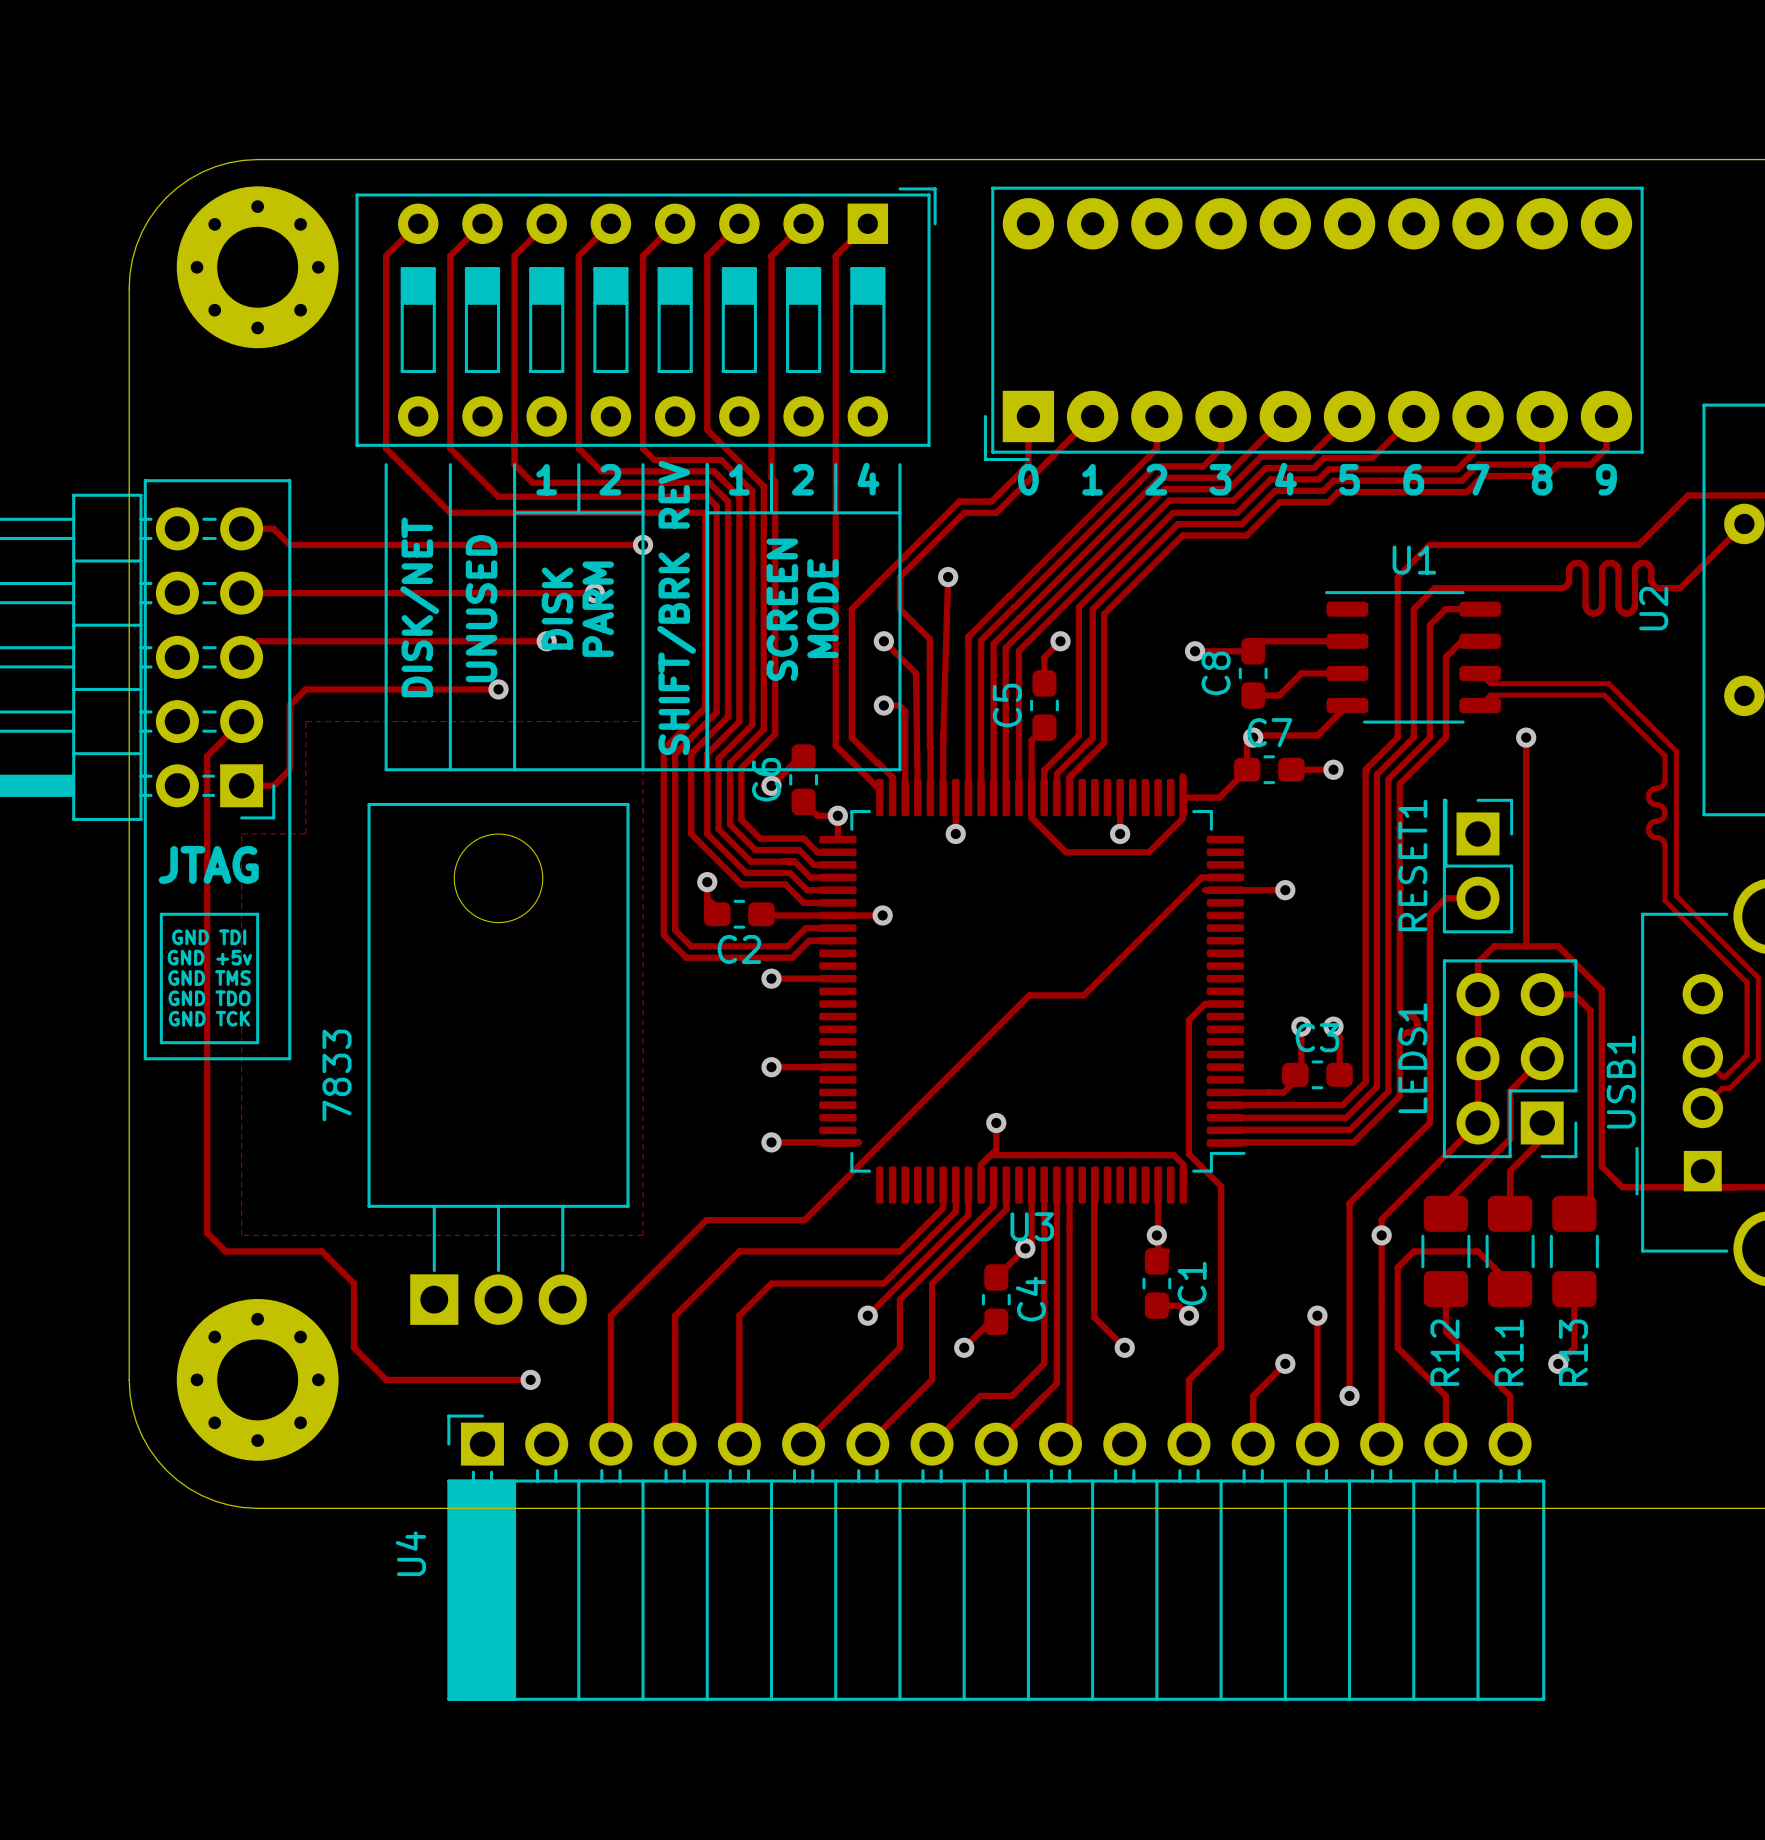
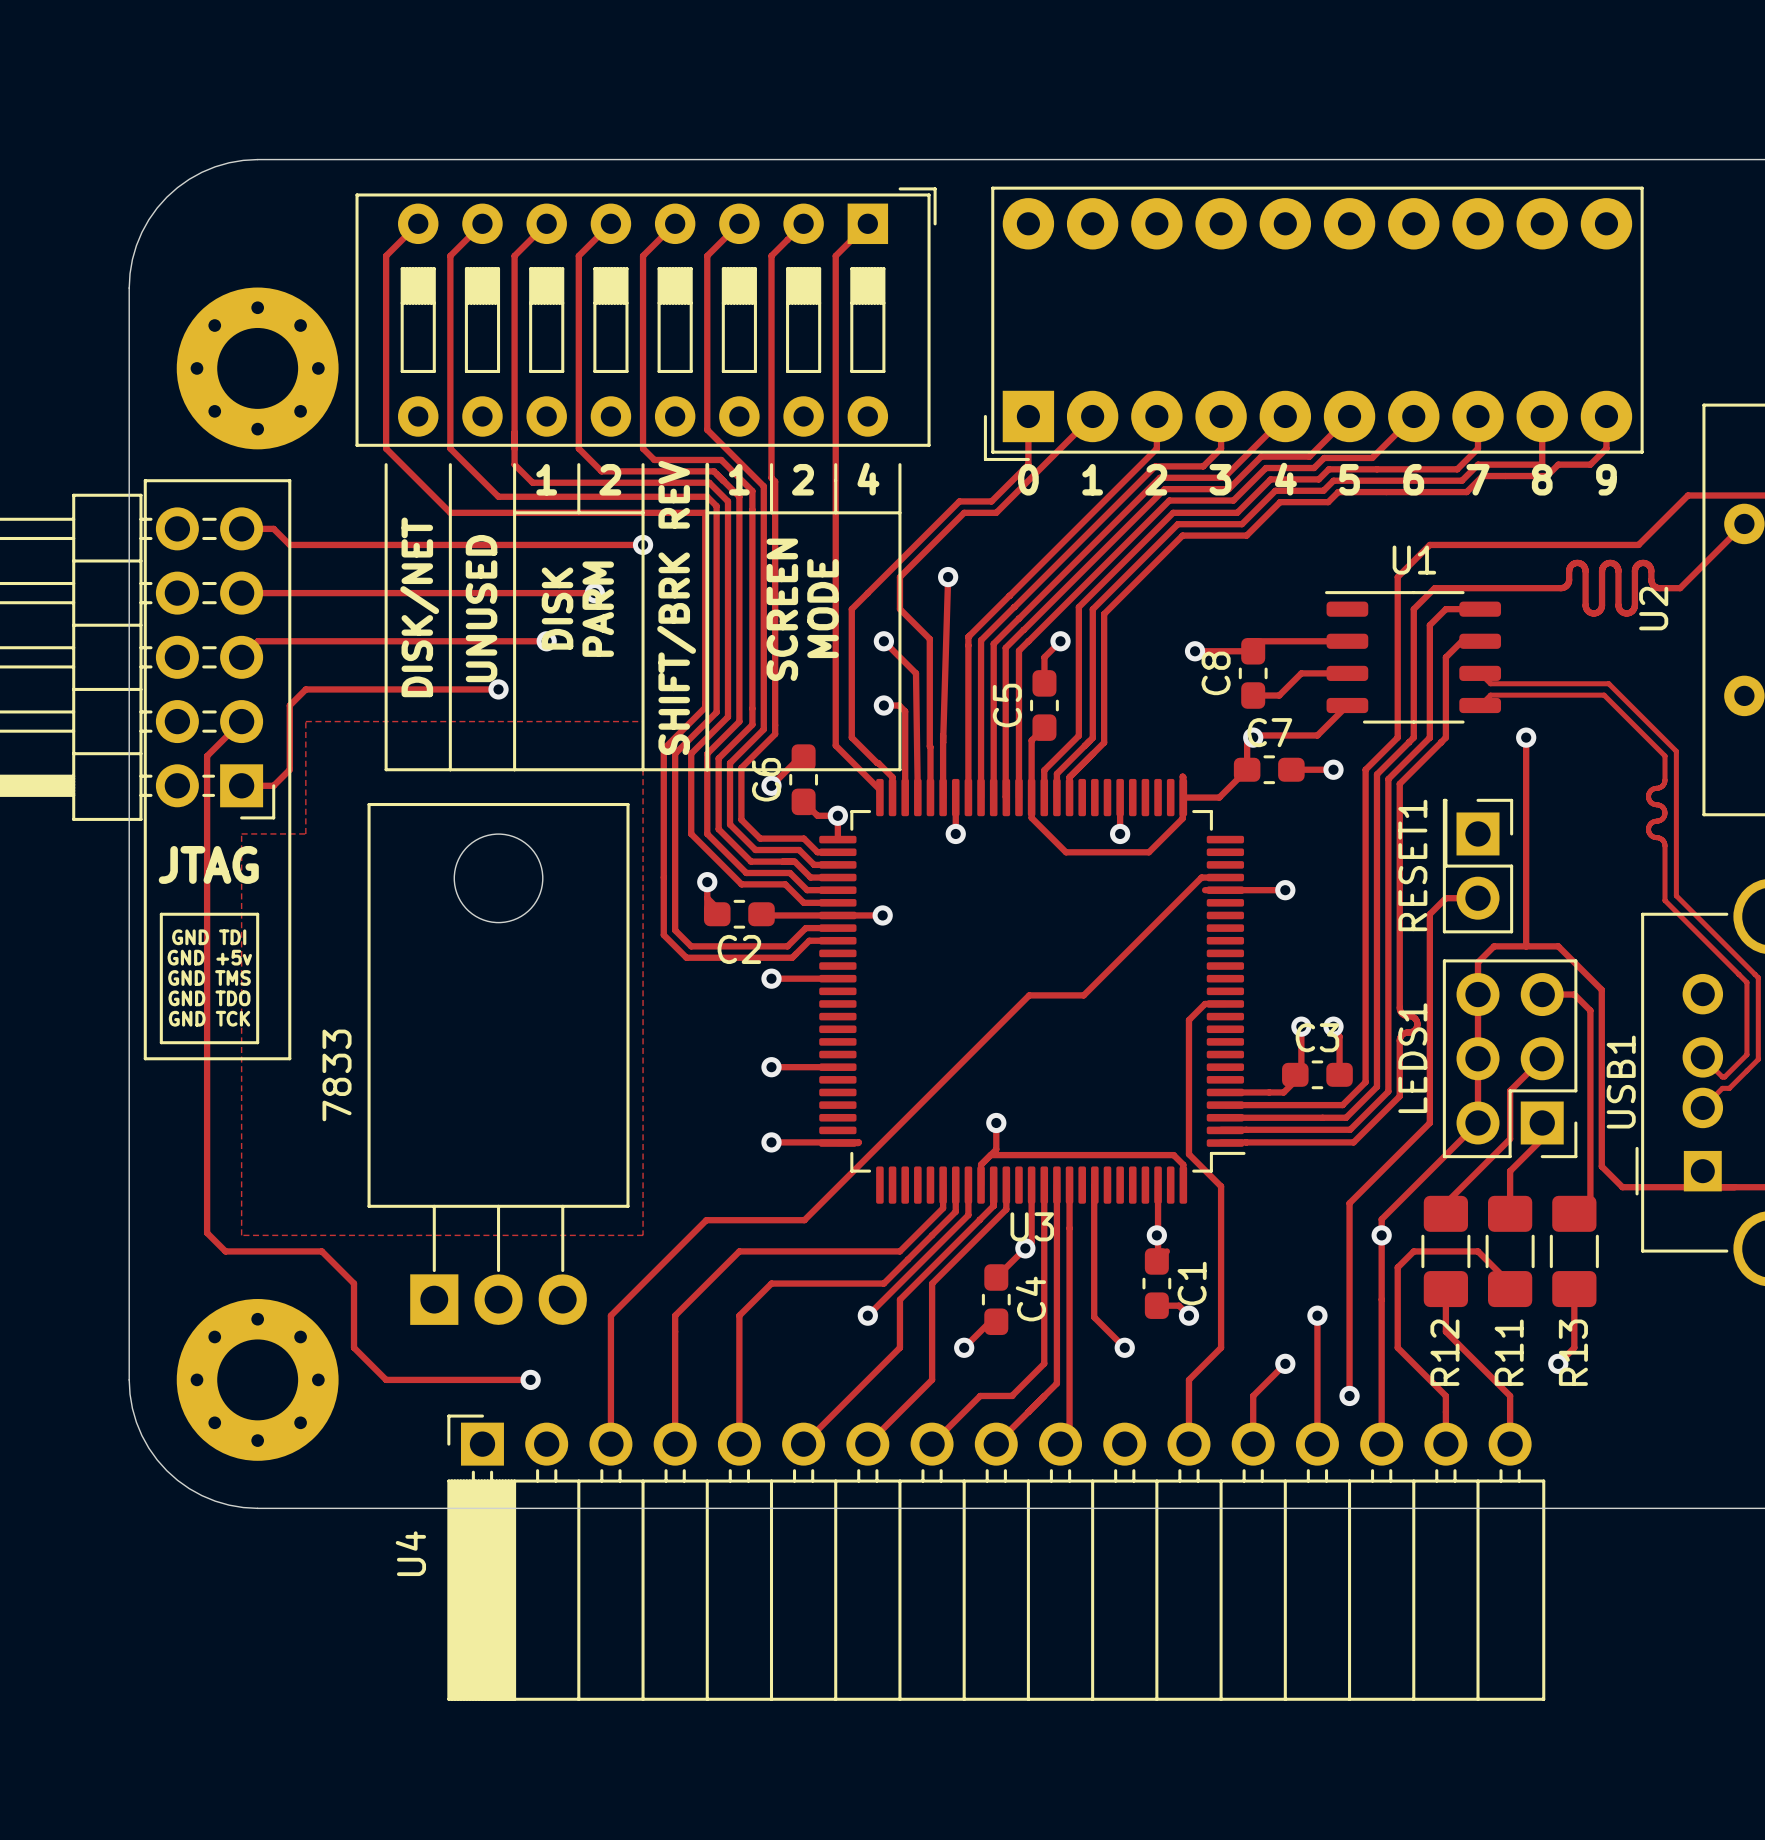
part position: (257, 267) -> (257, 368)

